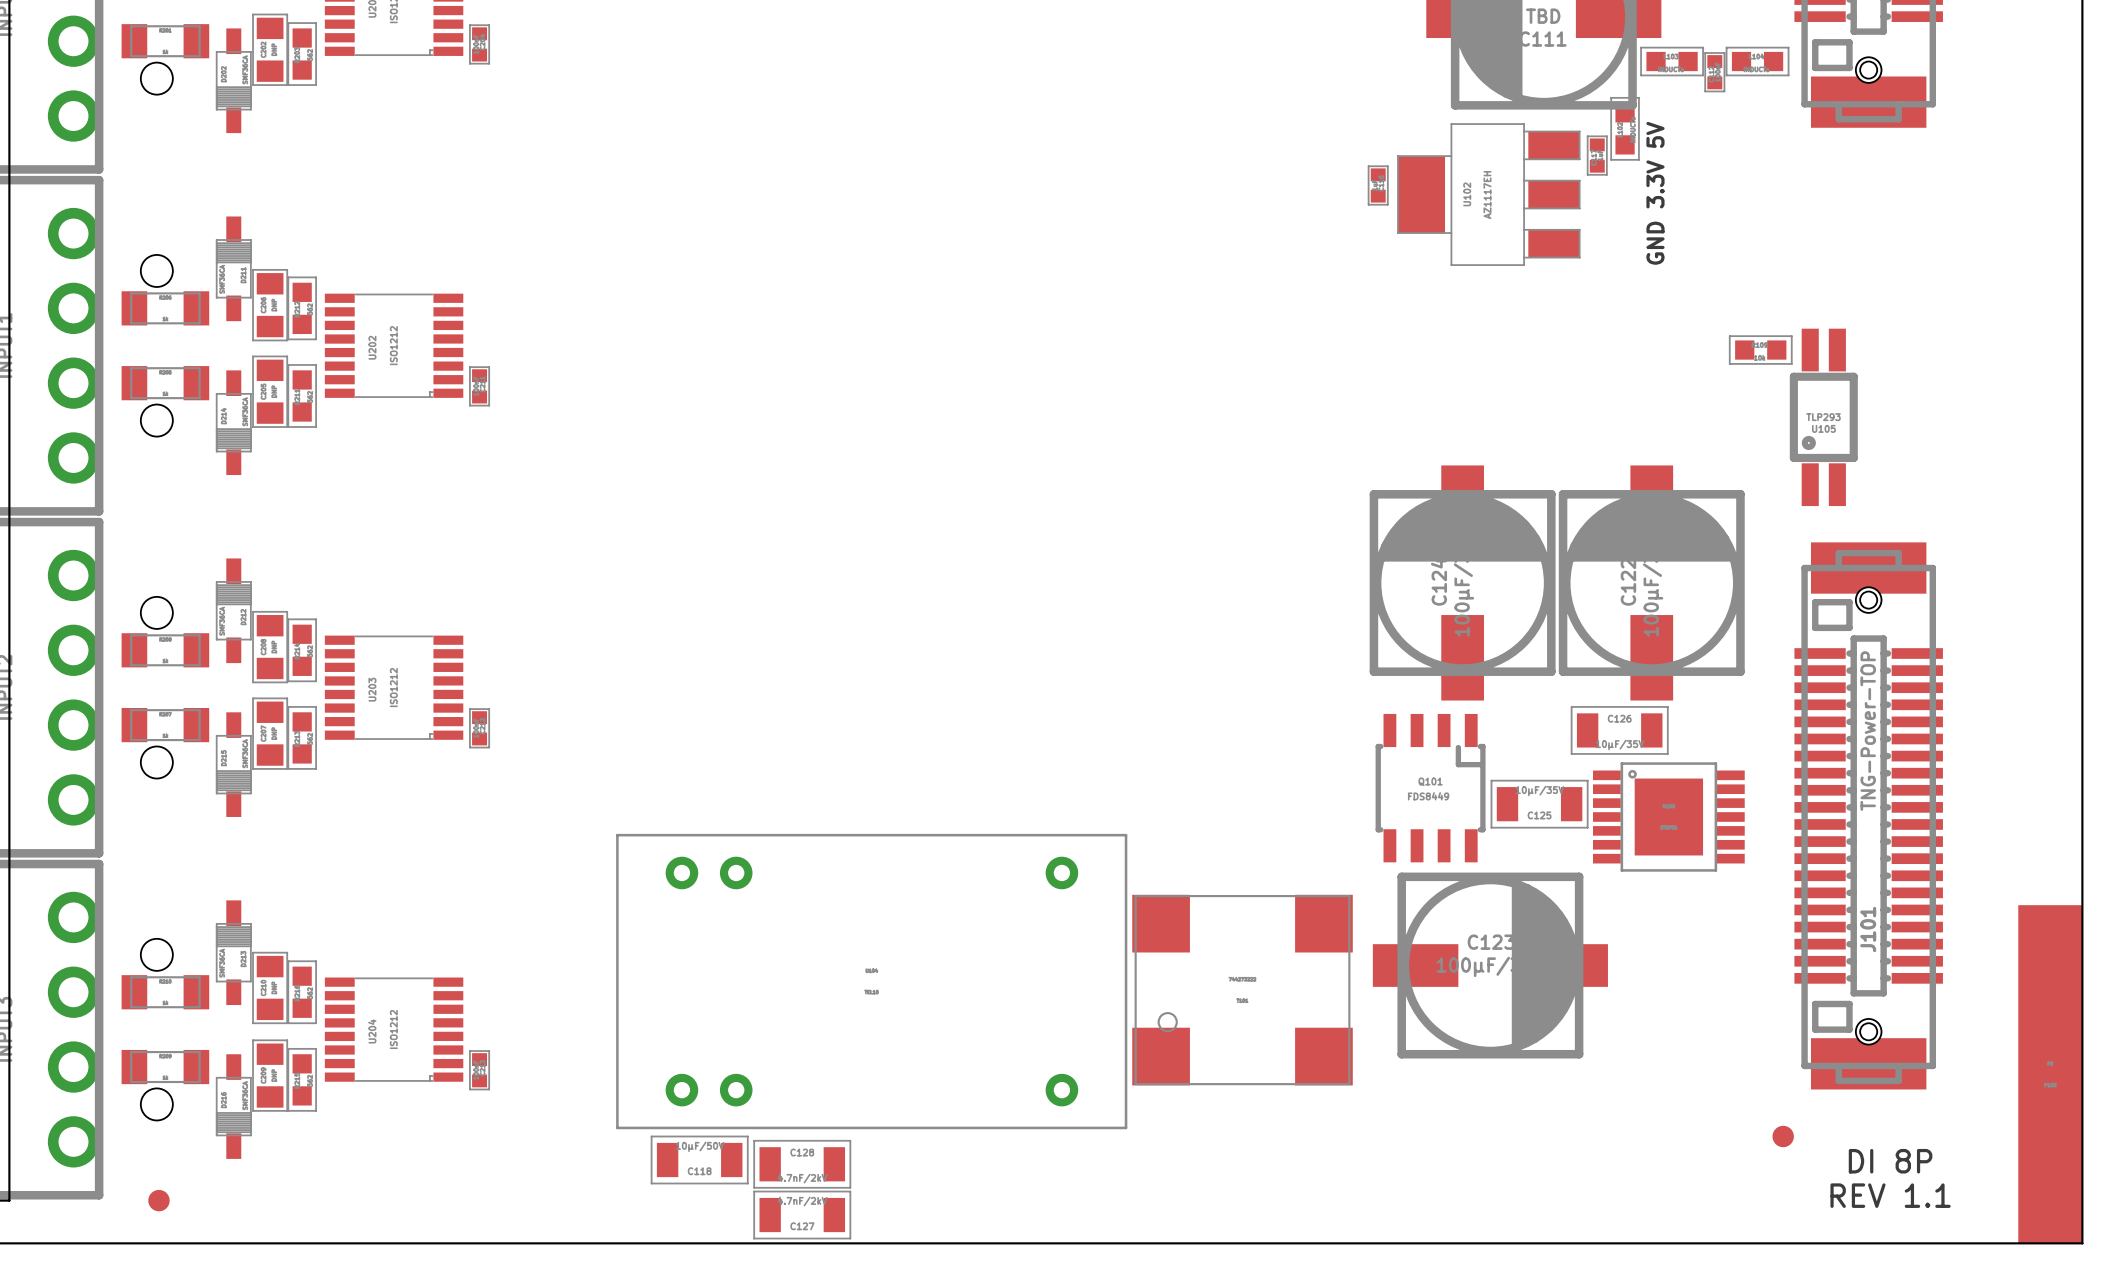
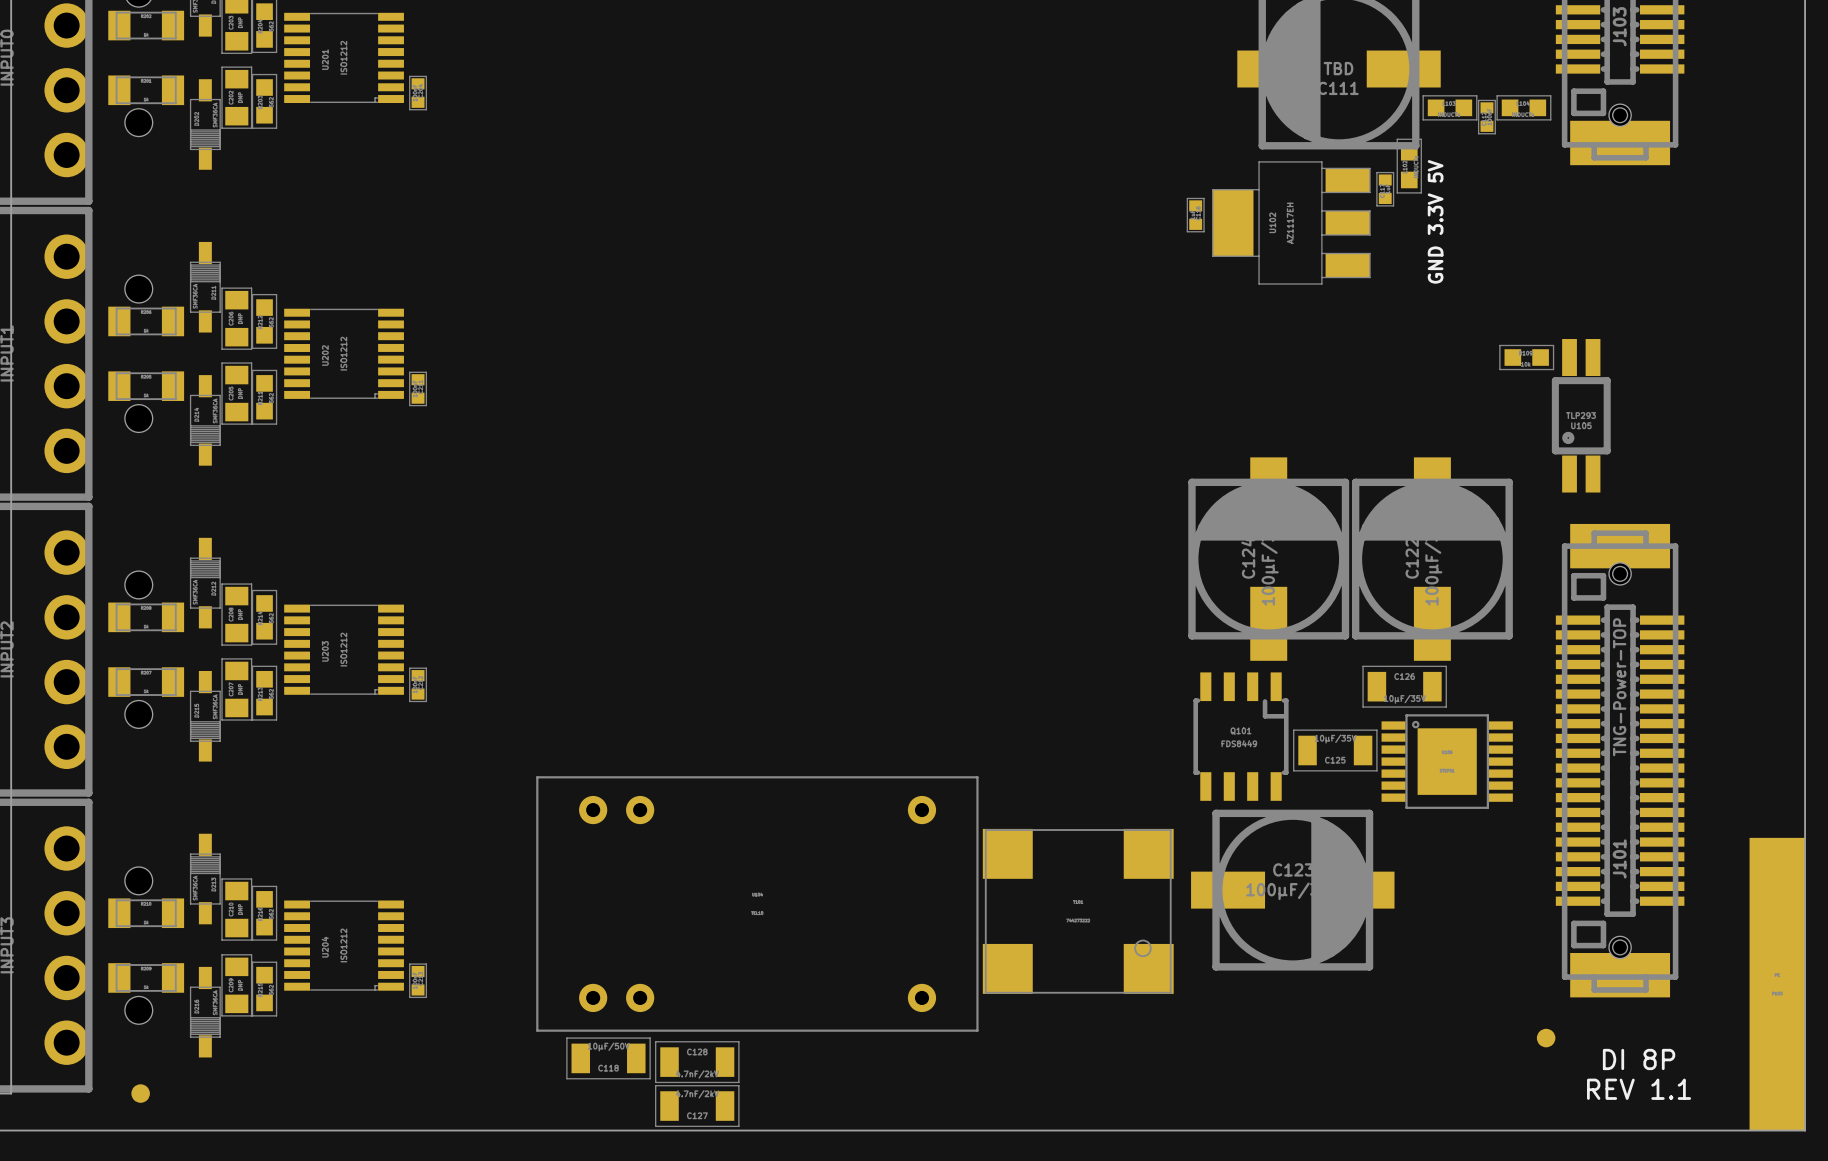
part footprint: [1132, 894, 1353, 1086] -> [982, 828, 1174, 994]

